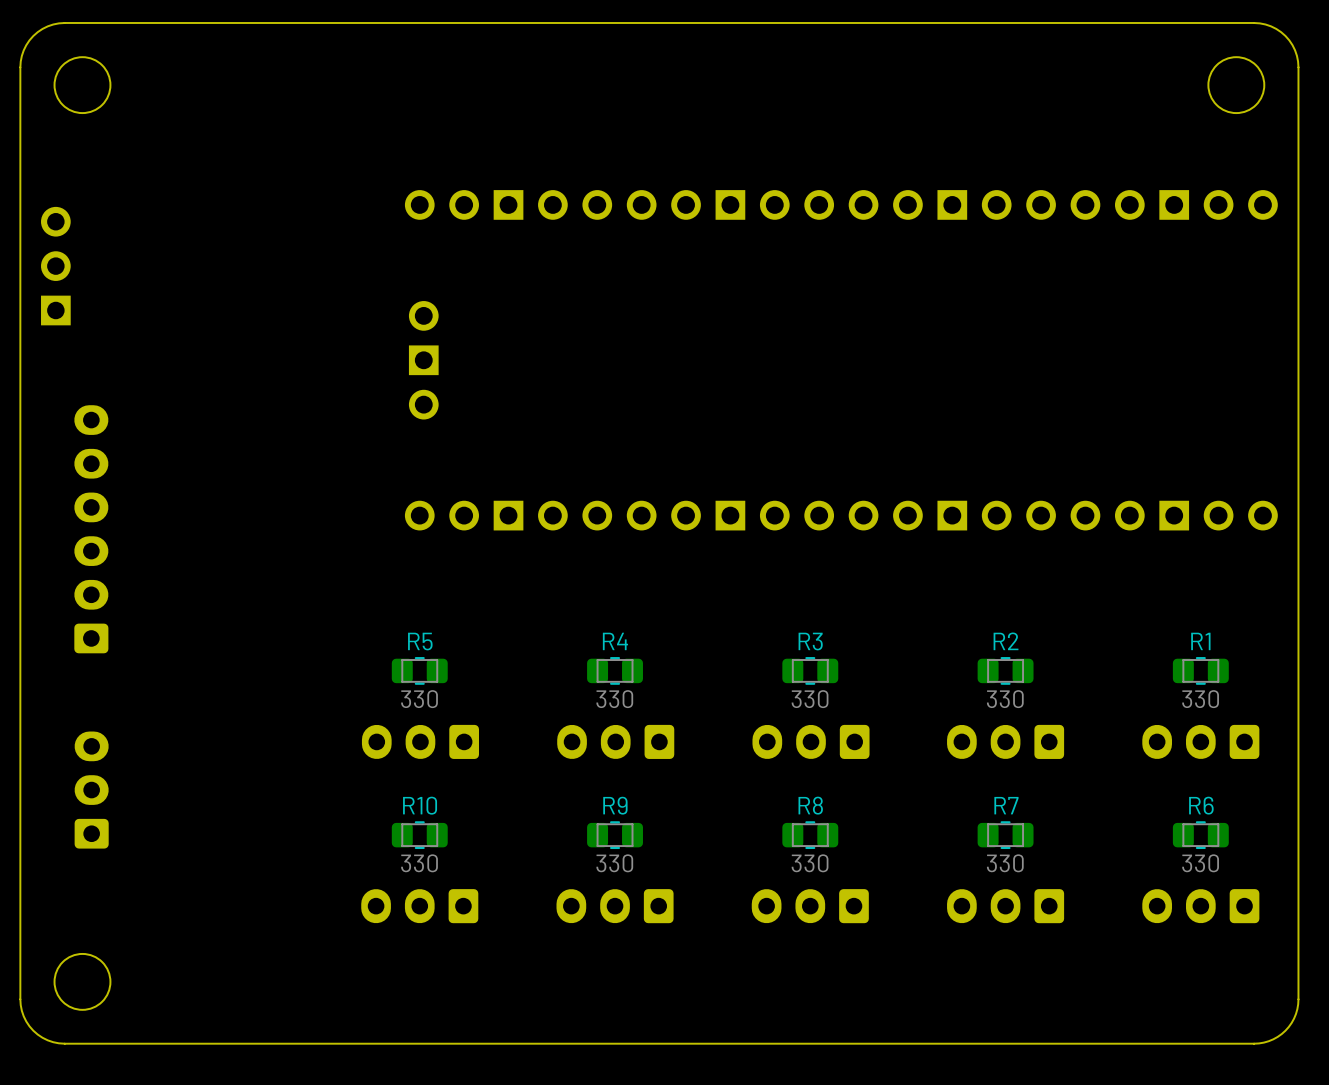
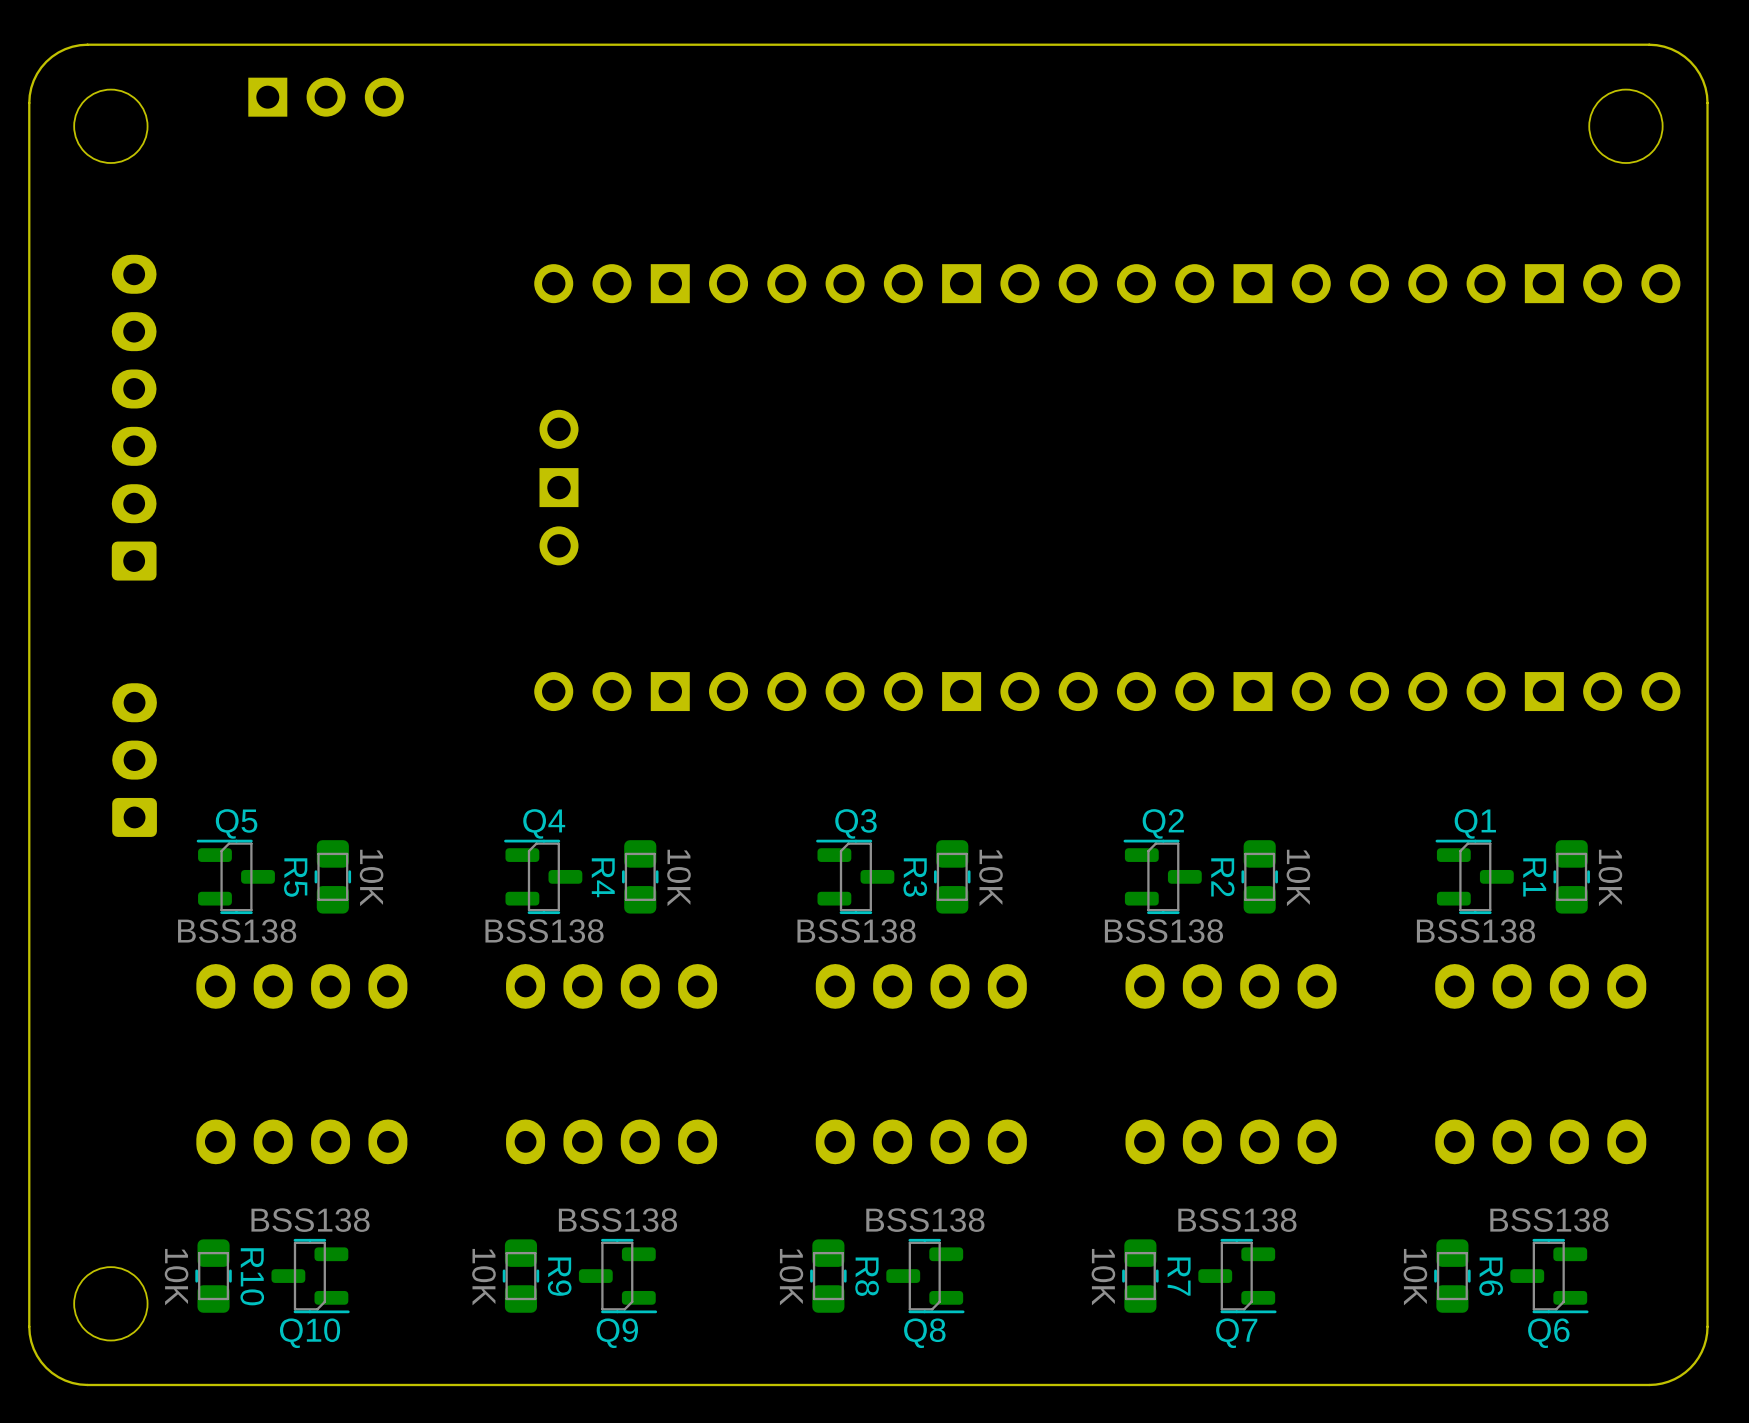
part rotation: 0° (55, 266) -> 90° clockwise (326, 97)
part position: (55, 266) -> (326, 97)
part position: (91, 529) -> (134, 417)
part: none -> (134, 760)
R5 name position: R5 (420, 641) -> R5 (295, 877)
R4 name position: R4 (615, 641) -> R4 (603, 877)
R3 name position: R3 (810, 641) -> R3 (915, 877)
R2 name position: R2 (1006, 641) -> R2 (1222, 877)
R1 name position: R1 (1200, 641) -> R1 (1534, 877)
Q5: none -> BSS138 (235, 876)
Q4: none -> BSS138 (543, 876)
Q3: none -> BSS138 (855, 876)
Q2: none -> BSS138 (1162, 876)
Q1: none -> BSS138 (1474, 876)
R5 rotation: 0° (419, 670) -> 90° clockwise (332, 876)
R5 position: (419, 670) -> (332, 876)
R4 rotation: 0° (615, 670) -> 90° clockwise (640, 876)
R4 position: (615, 670) -> (640, 876)
R3 rotation: 0° (810, 670) -> 90° clockwise (952, 876)
R3 position: (810, 670) -> (952, 876)
R2 rotation: 0° (1005, 670) -> 90° clockwise (1259, 876)
R2 position: (1005, 670) -> (1259, 876)
R1 rotation: 0° (1200, 670) -> 90° clockwise (1571, 876)
R5 value: 330 (419, 699) -> 10K (371, 877)
R4 value: 330 (614, 699) -> 10K (678, 877)
R3 value: 330 (810, 699) -> 10K (990, 877)
R2 value: 330 (1005, 699) -> 10K (1298, 877)
R1 value: 330 (1200, 699) -> 10K (1610, 877)
part: none -> (301, 986)
part: none -> (611, 986)
part: none -> (921, 986)
part: none -> (1231, 986)
part: none -> (1540, 986)
part: (420, 741) -> none
part: (615, 741) -> none
part: (811, 741) -> none
part: (1005, 741) -> none
part: (1200, 741) -> none
part: (91, 790) -> none
R10 rotation: 0° (419, 835) -> 90° clockwise (213, 1276)
R10 position: (419, 835) -> (213, 1276)
R9 rotation: 0° (615, 835) -> 90° clockwise (520, 1276)
R9 position: (615, 835) -> (520, 1276)
R8 rotation: 0° (810, 835) -> 90° clockwise (828, 1276)
R8 position: (810, 835) -> (828, 1276)
R7 rotation: 0° (1005, 835) -> 90° clockwise (1140, 1276)
R7 position: (1005, 835) -> (1140, 1276)
R6 rotation: 0° (1200, 835) -> 90° clockwise (1452, 1276)
R6 position: (1200, 835) -> (1452, 1276)
part: none -> (301, 1141)
part: none -> (611, 1141)
part: none -> (921, 1141)
part: none -> (1231, 1141)
part: none -> (1540, 1141)
R10 value: 330 (419, 863) -> 10K (176, 1277)
R9 value: 330 (614, 863) -> 10K (483, 1277)
R8 value: 330 (810, 863) -> 10K (791, 1277)
R7 value: 330 (1005, 863) -> 10K (1103, 1277)
R6 value: 330 (1200, 863) -> 10K (1415, 1277)
part: (419, 906) -> none
part: (615, 906) -> none
part: (810, 906) -> none
part: (1005, 906) -> none
part: (1200, 906) -> none
Q10: none -> BSS138 (310, 1276)
Q9: none -> BSS138 (618, 1276)
Q8: none -> BSS138 (925, 1276)
Q7: none -> BSS138 (1237, 1276)
Q6: none -> BSS138 (1549, 1276)

